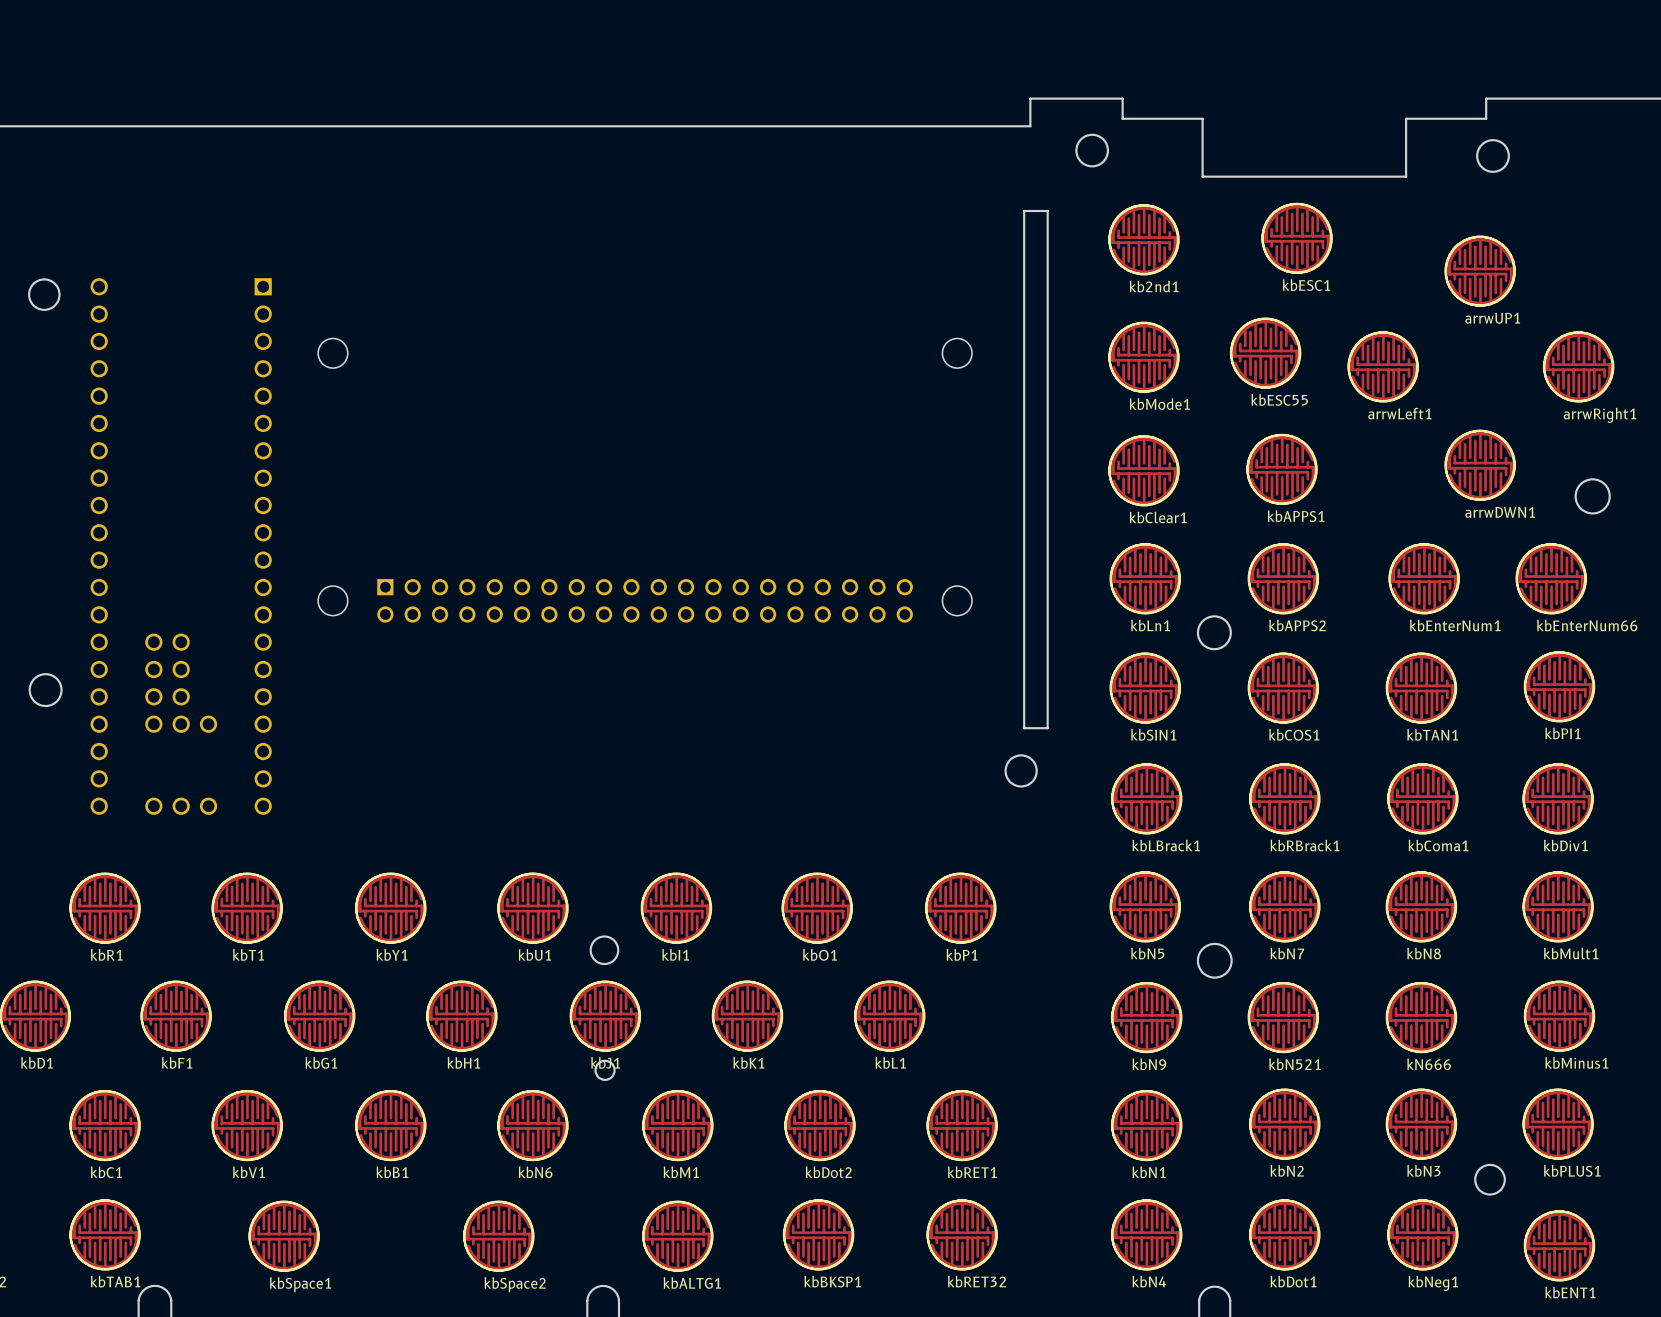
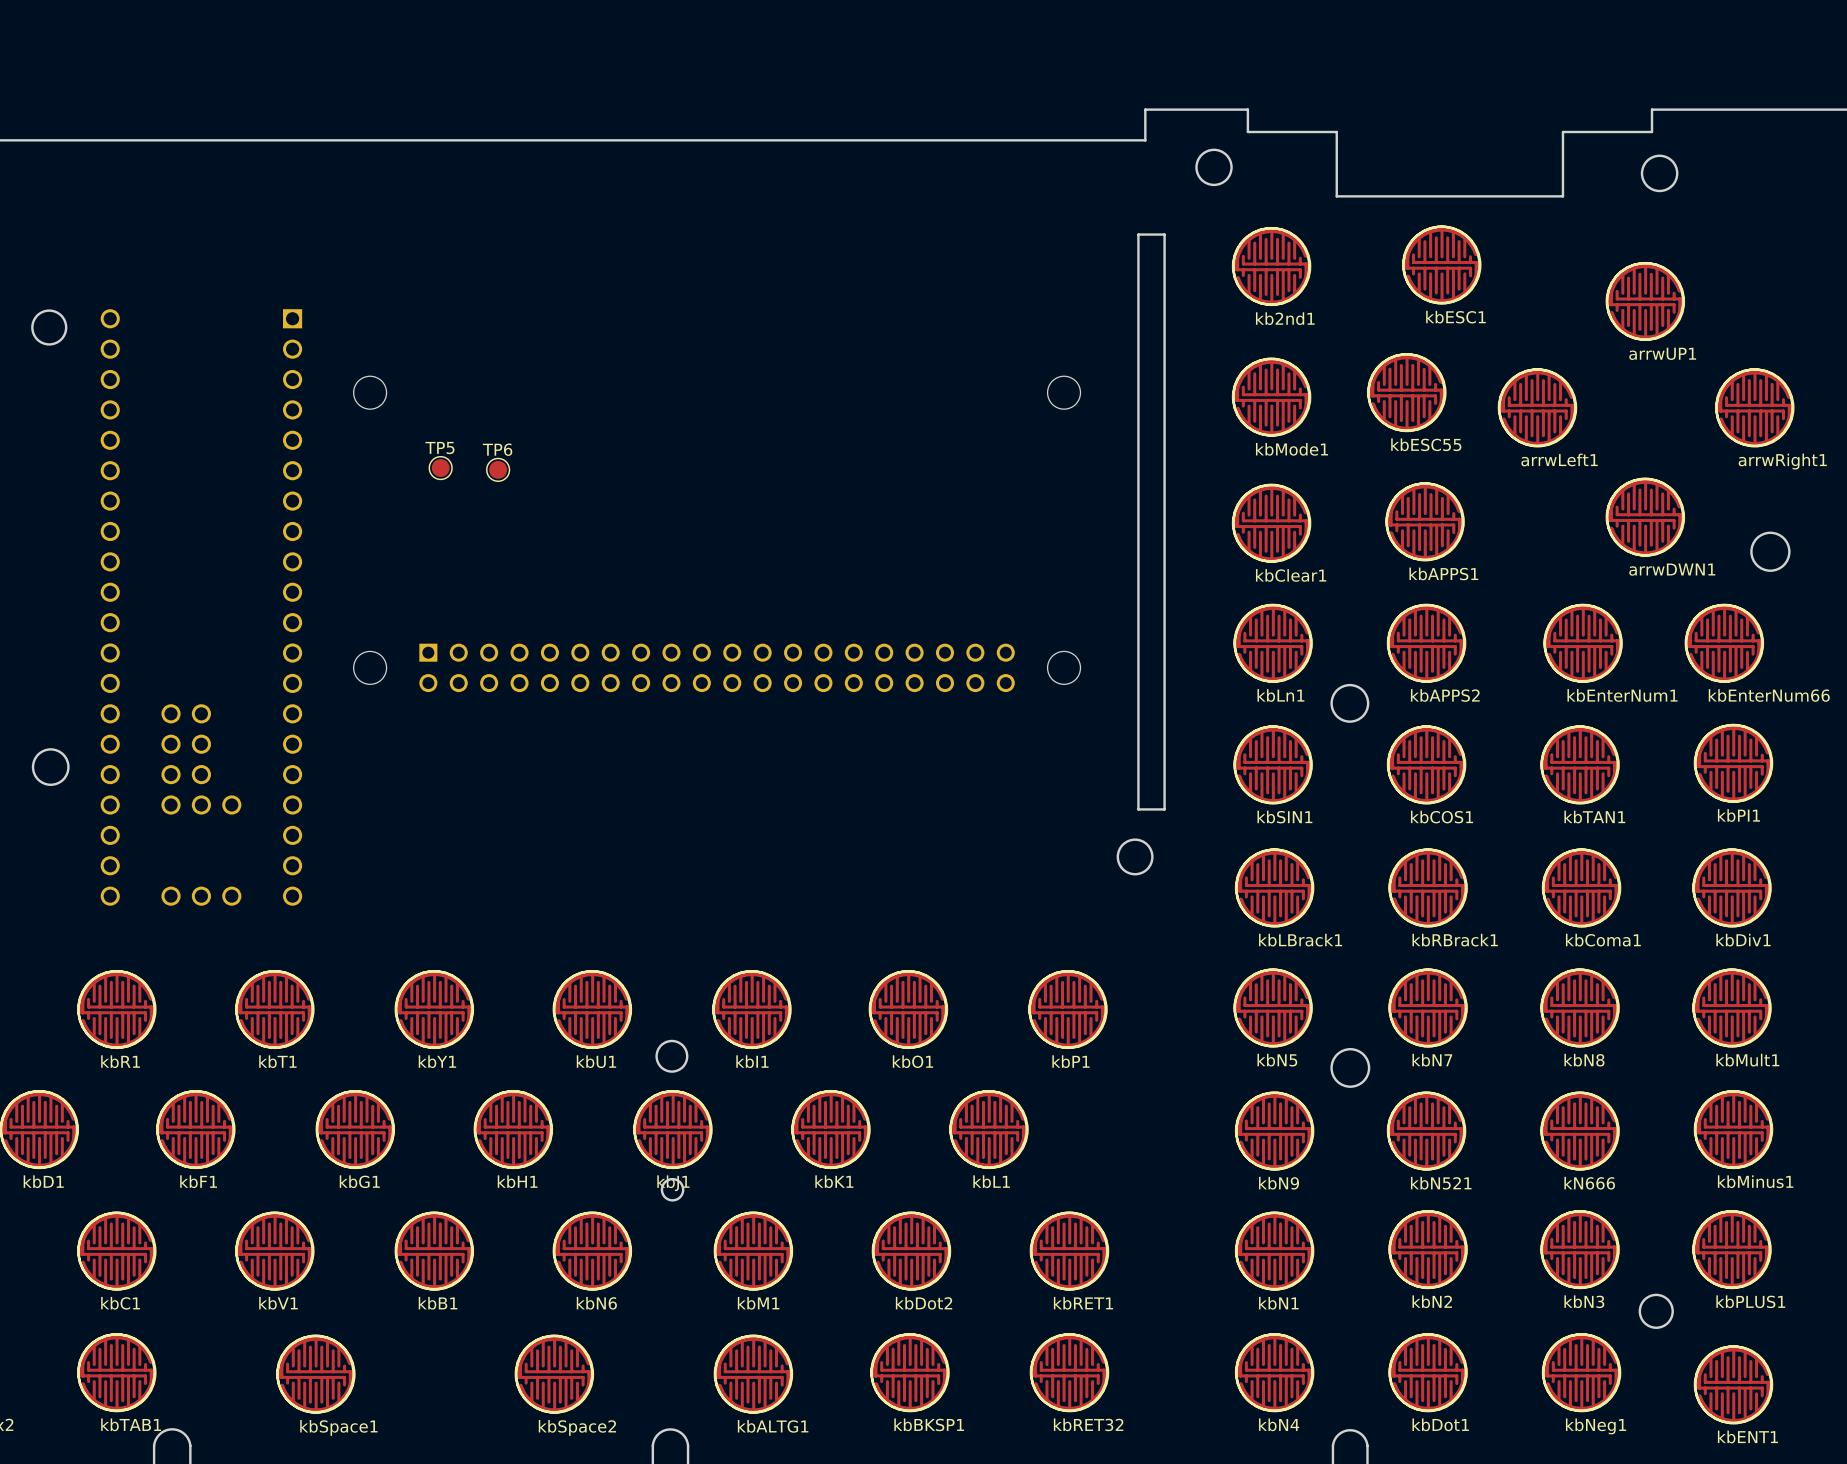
TP5: none -> (440, 468)
TP6: none -> (498, 469)

